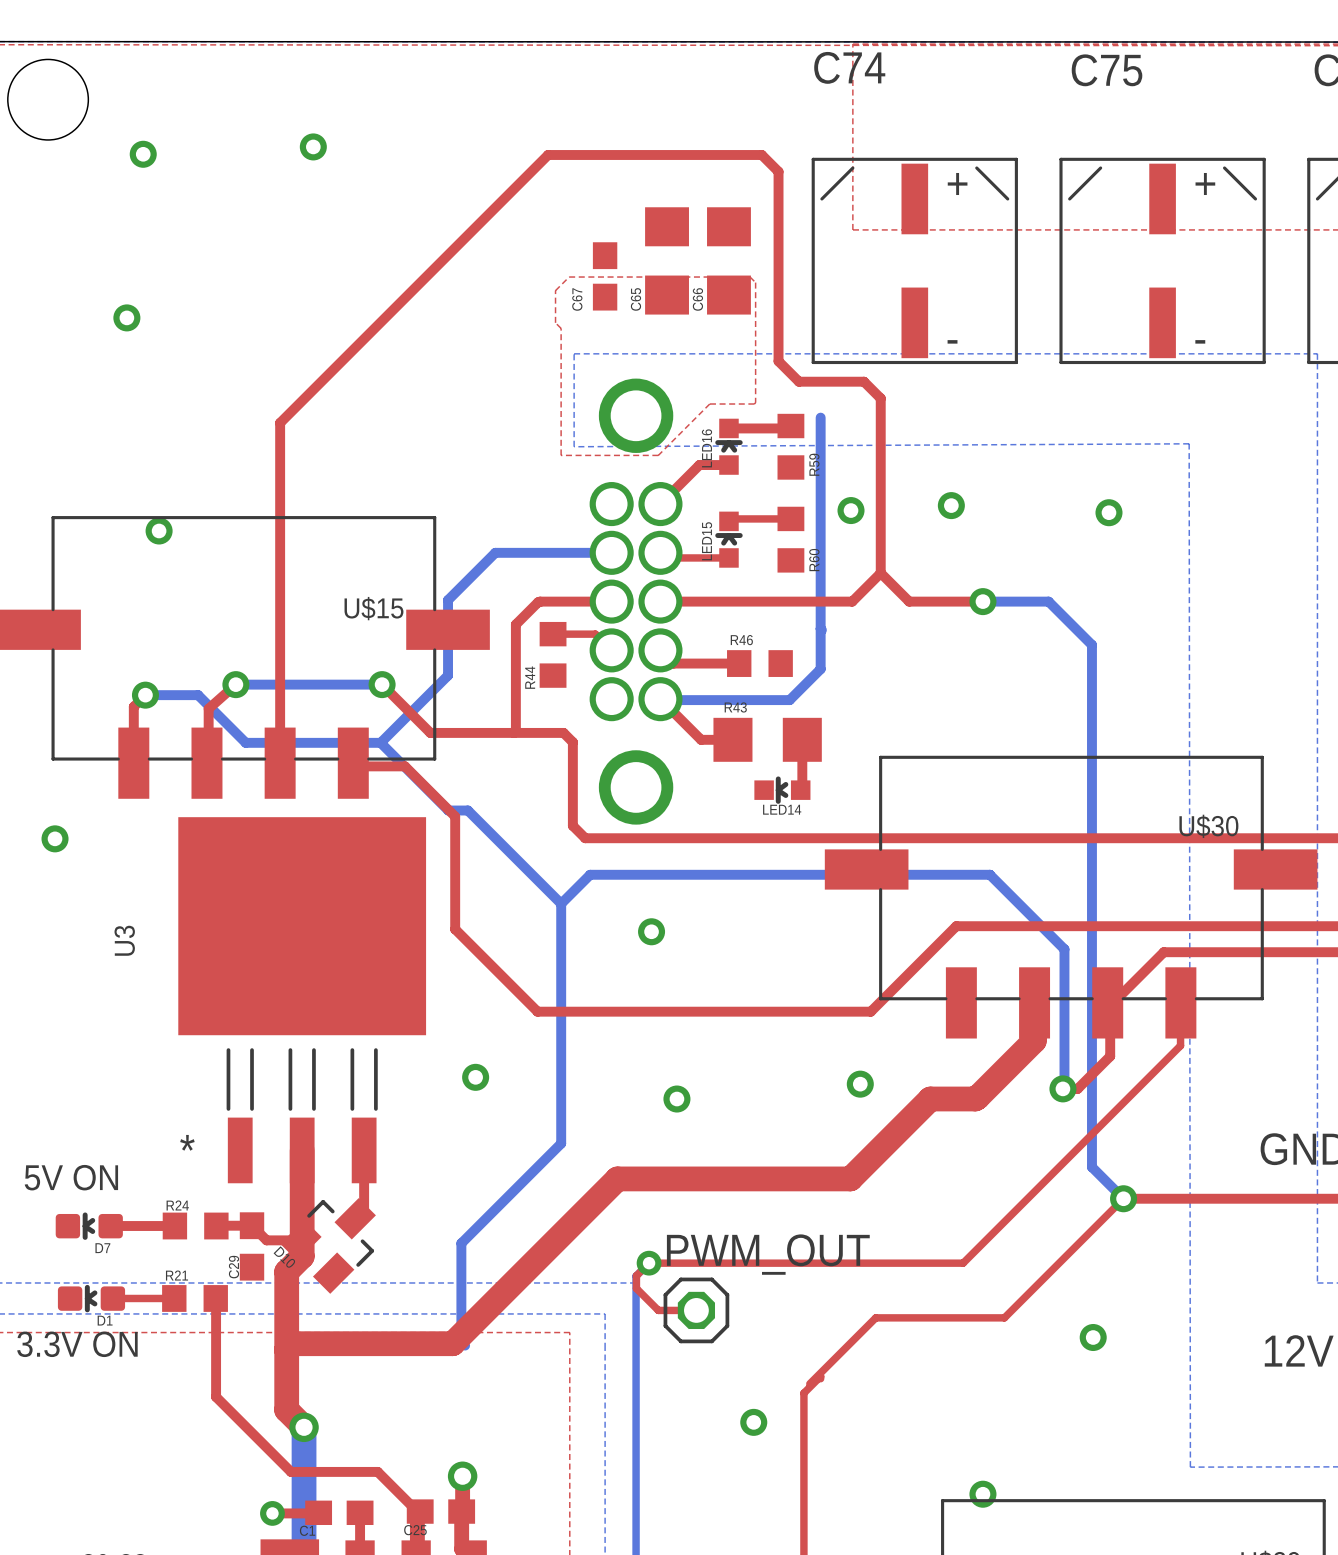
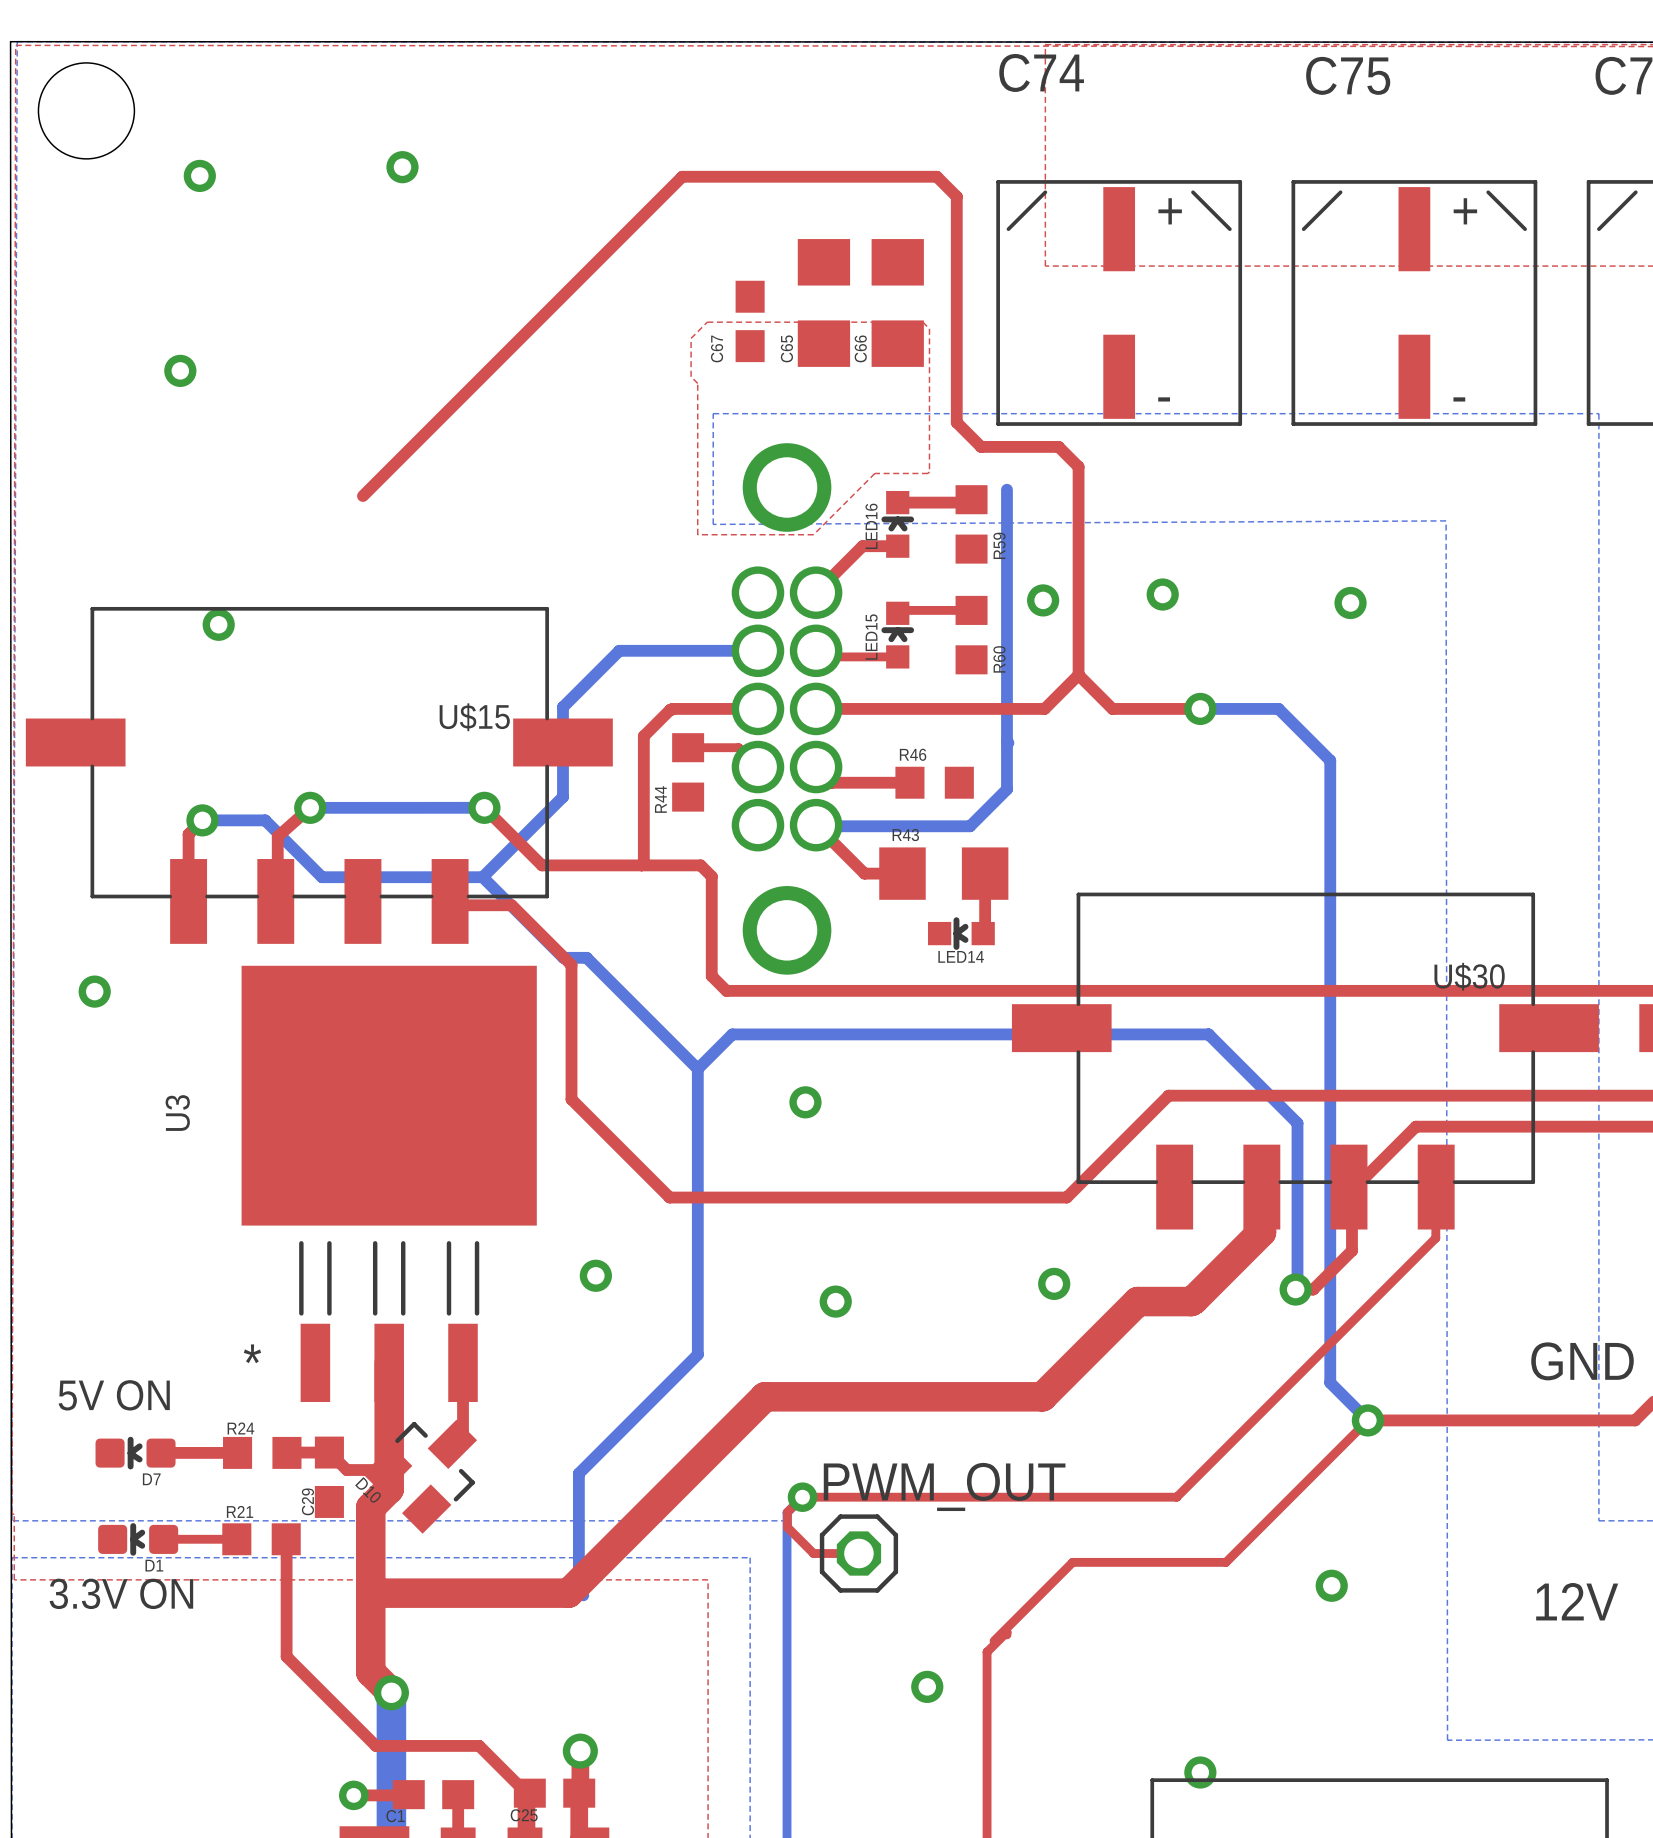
top track: (280, 422) (280, 763) -> none

